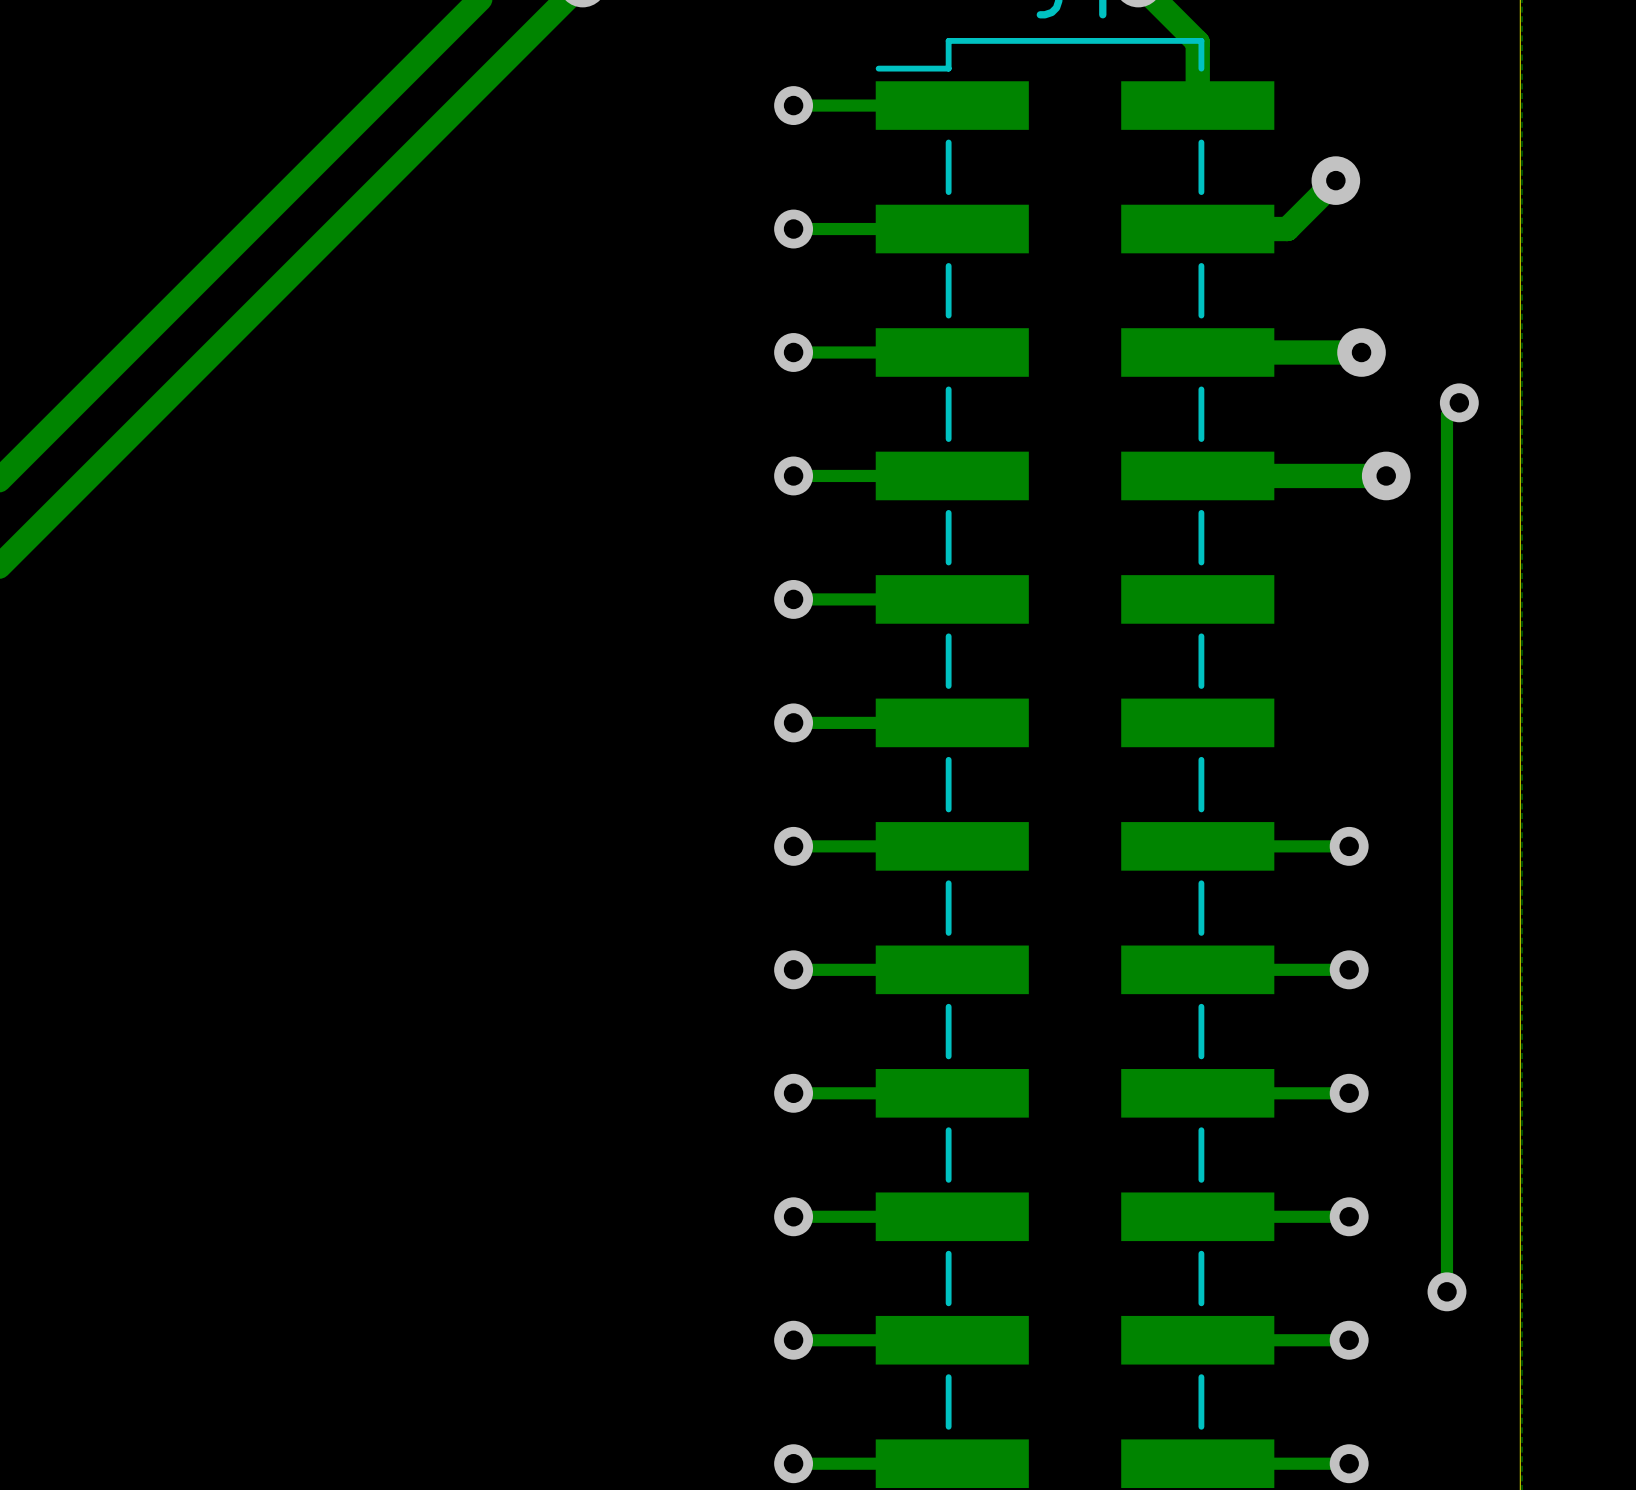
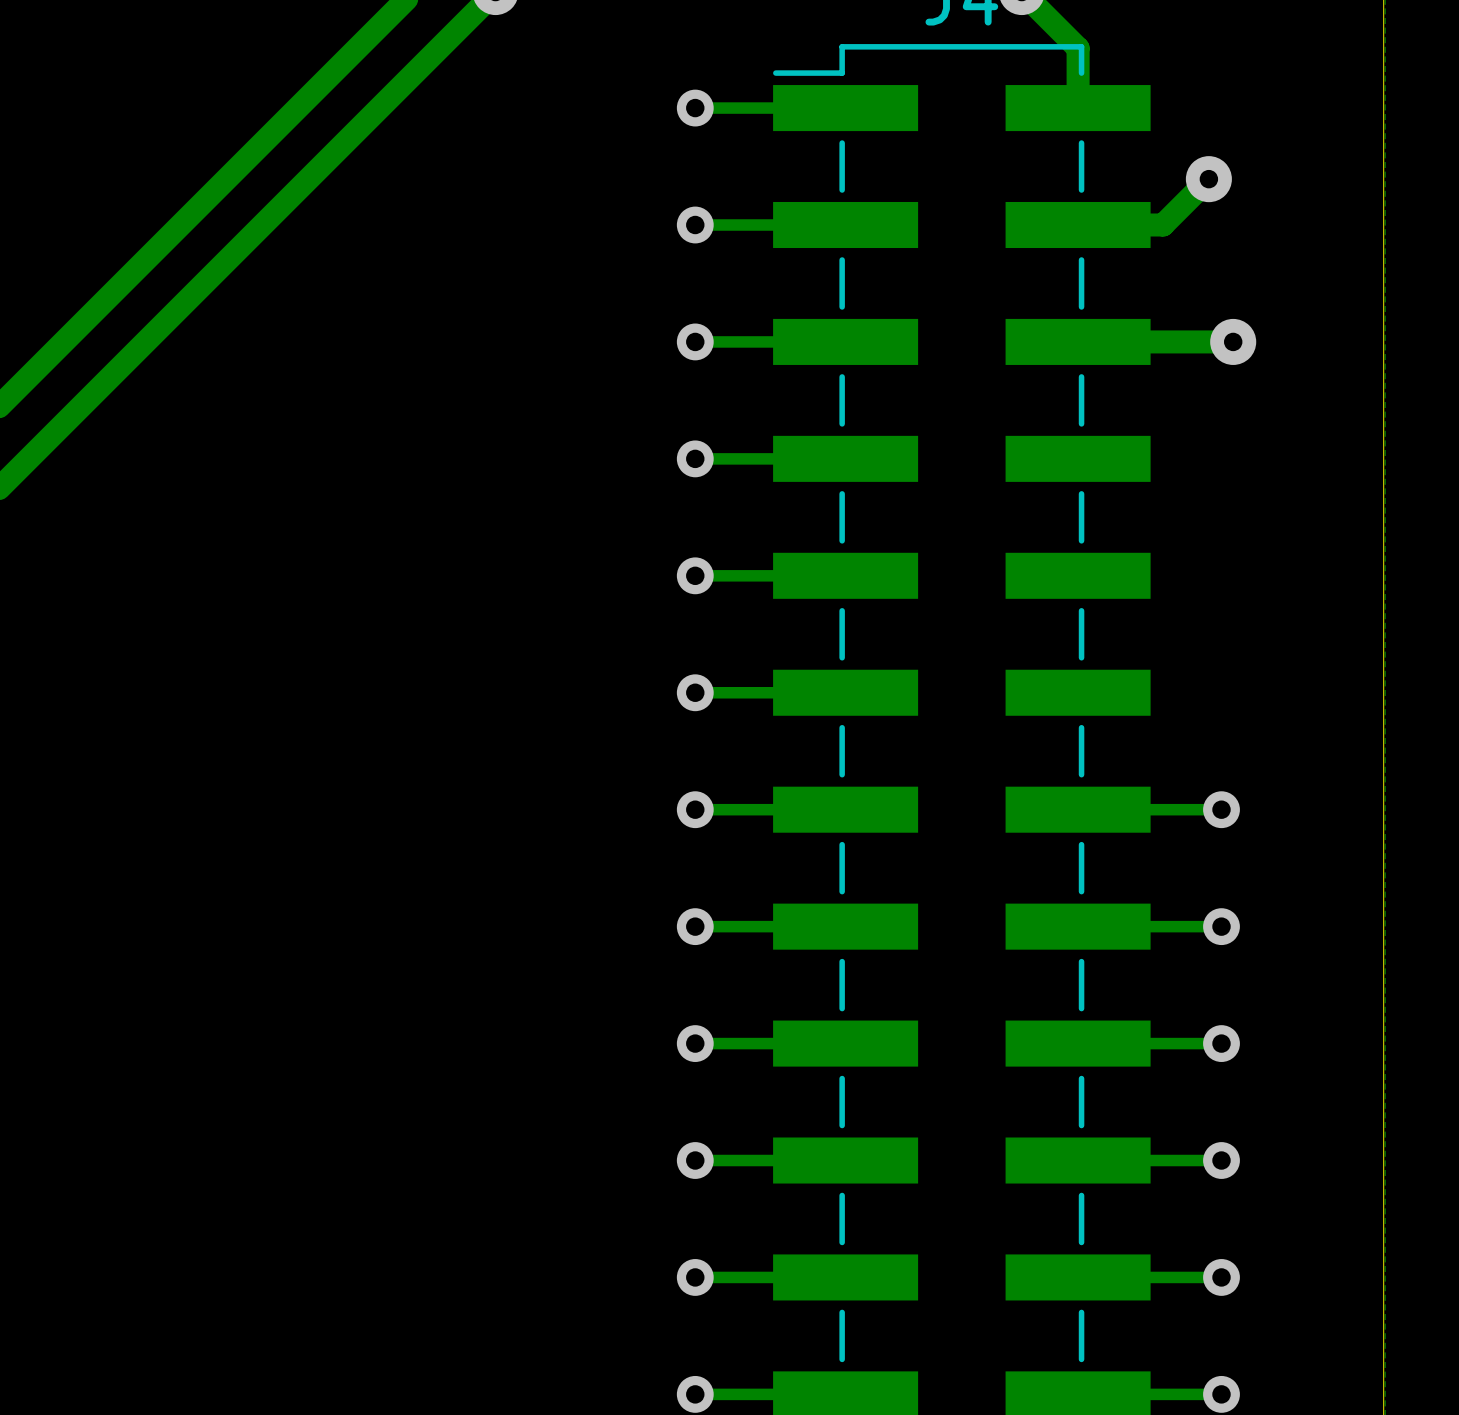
track: (1459, 402) (1446, 415) (1446, 1291) -> none
via: (1459, 402) -> none
track: (1386, 475) (1197, 475) -> none
via: (1386, 475) -> none
via: (1446, 1291) -> none

